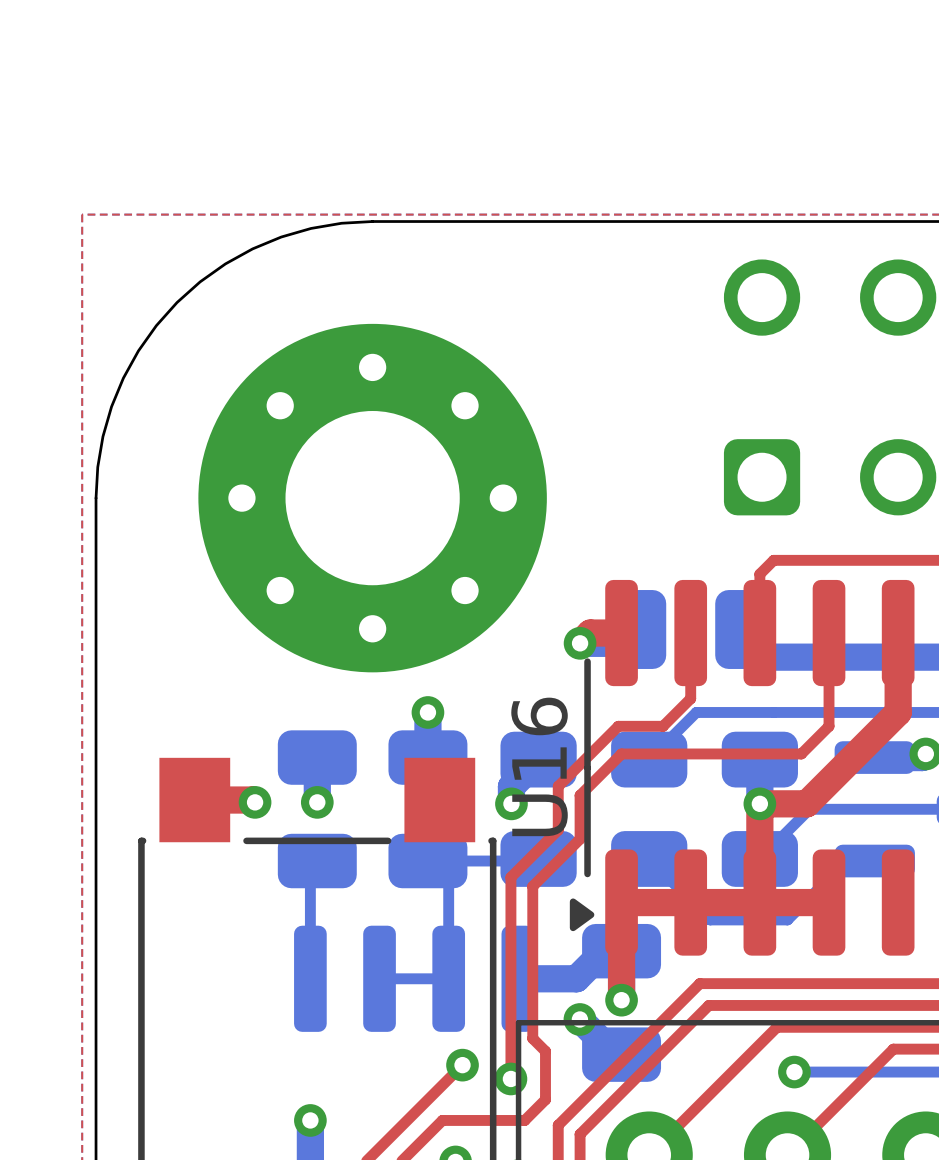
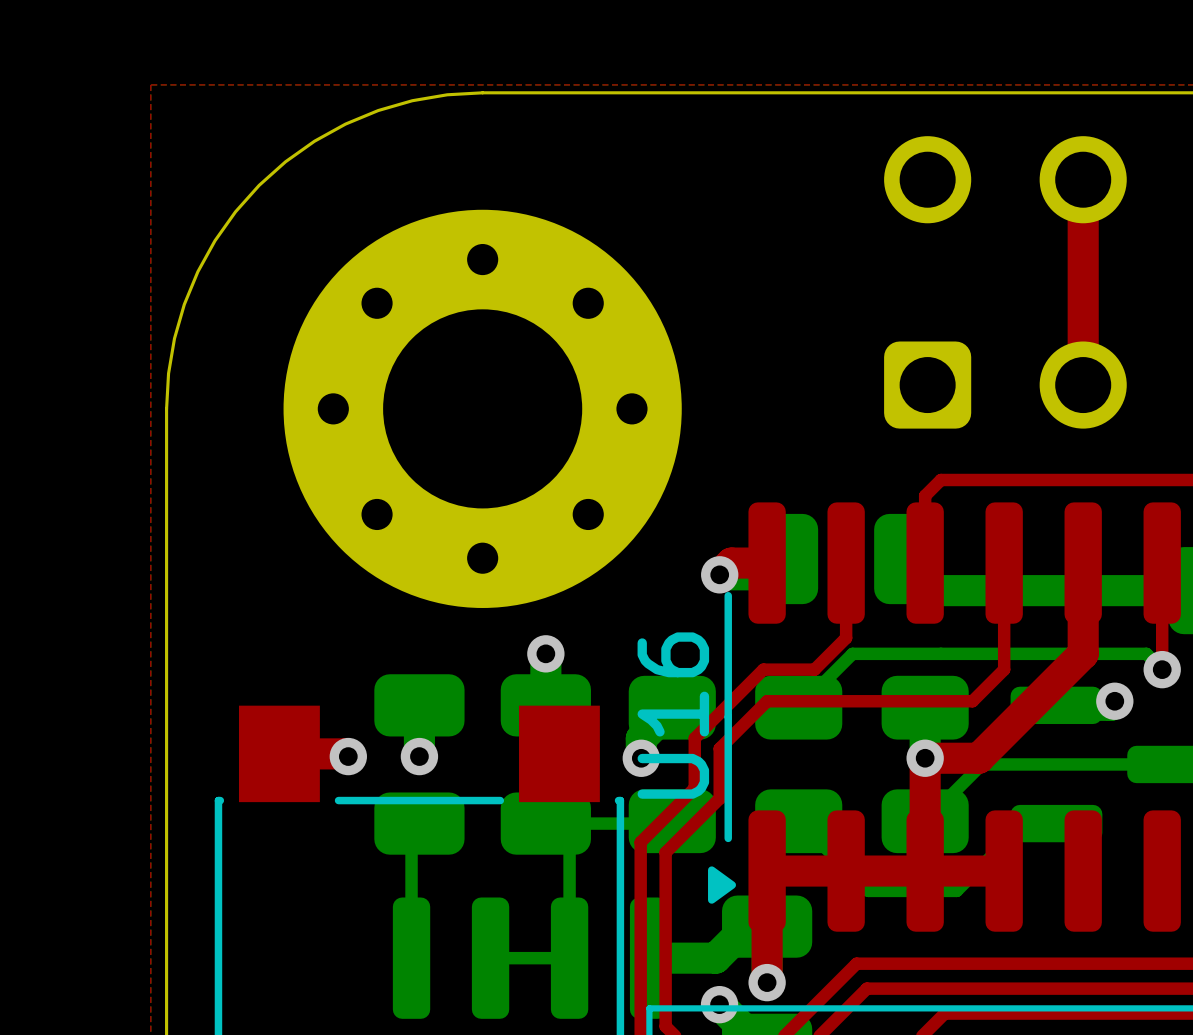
top track: none -> (1083, 179) (1083, 385)

